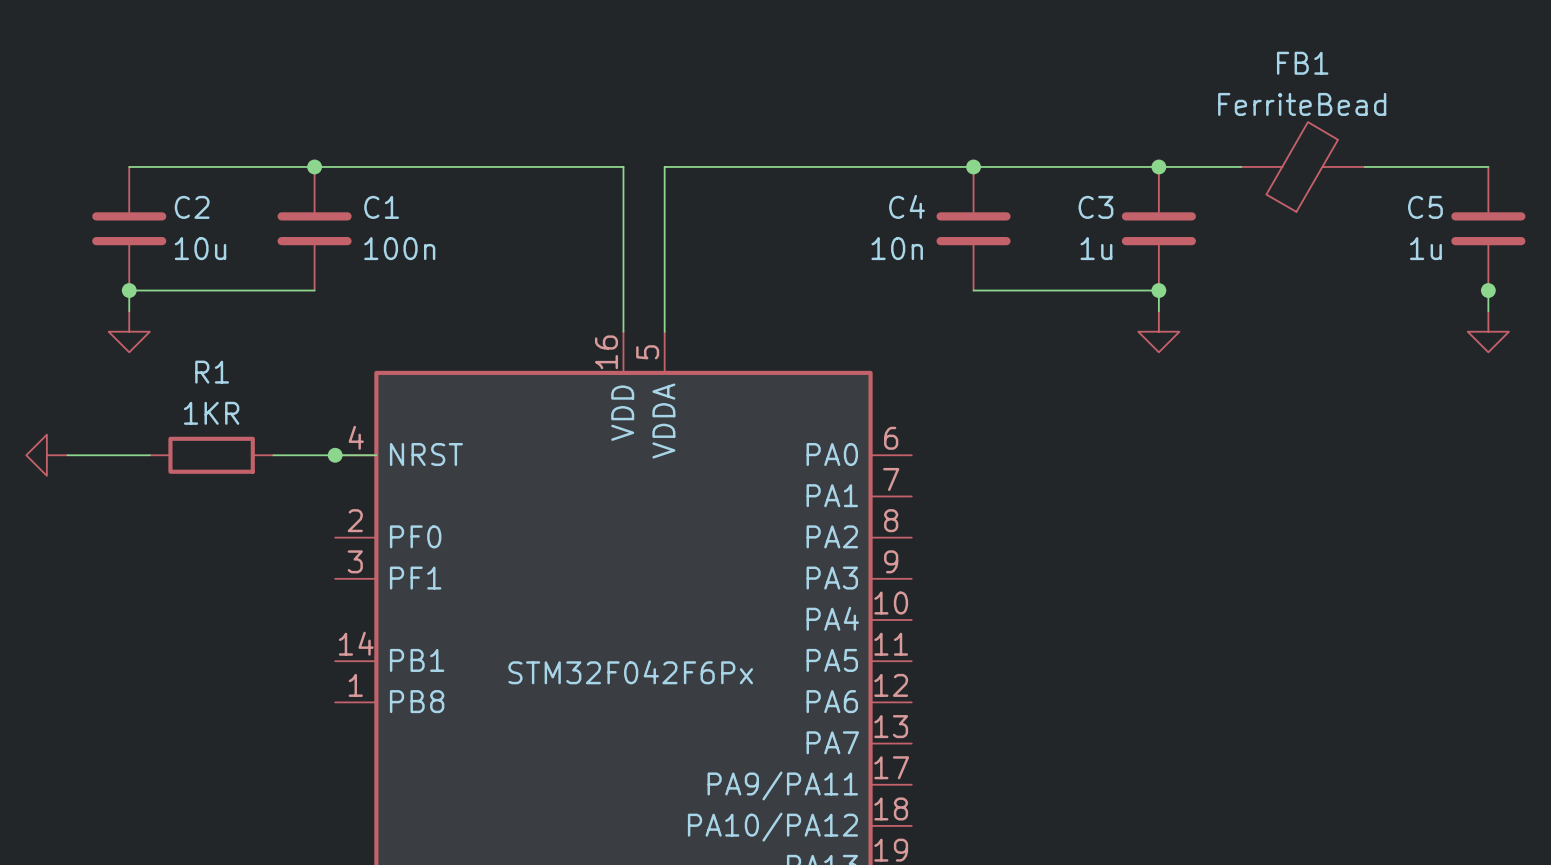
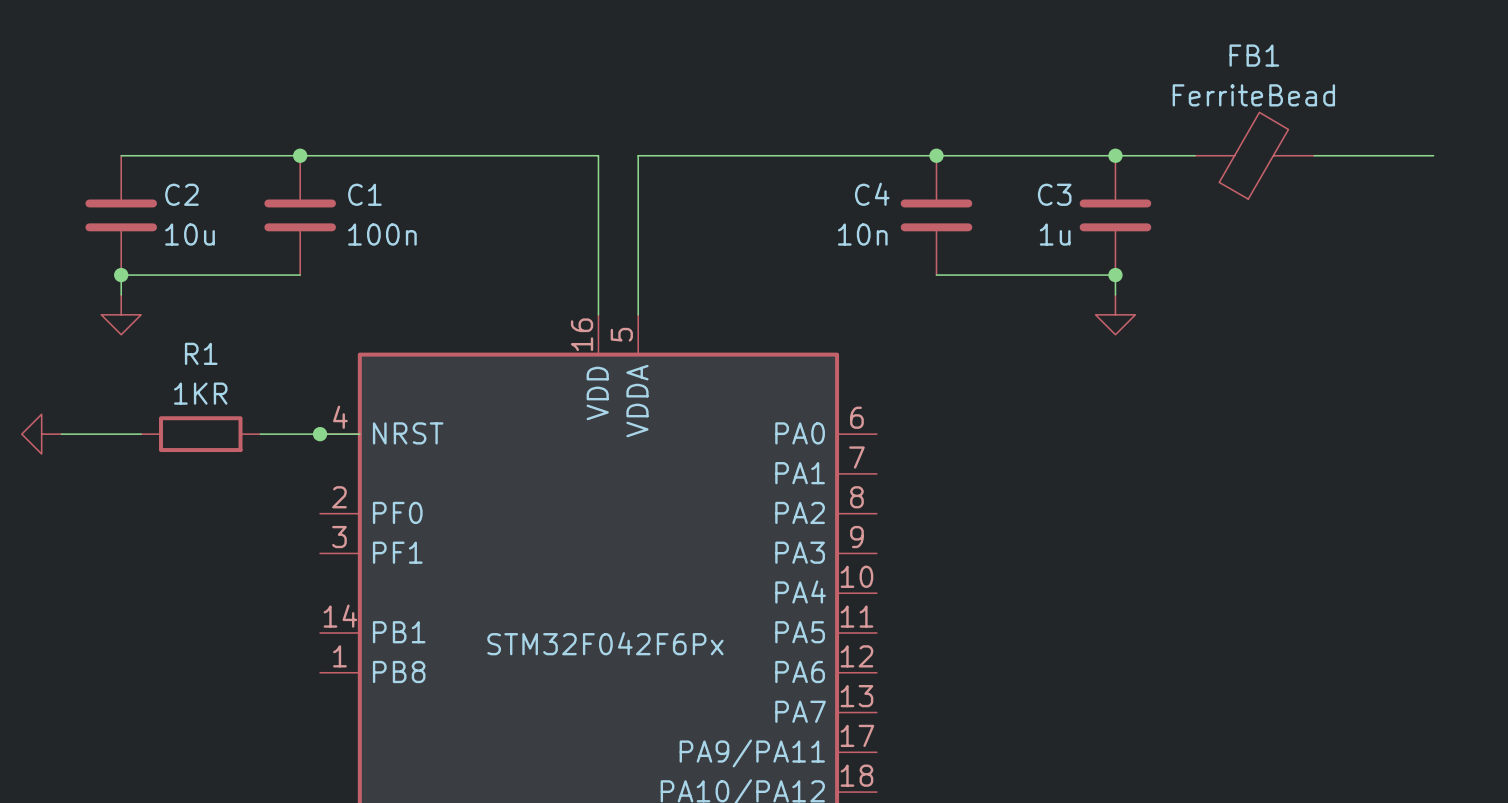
C5: 1u (1488, 228) -> none
wire: (1488, 290) (1488, 311) -> none
junction: (1488, 290) -> none
power symbol: (1488, 331) -> none

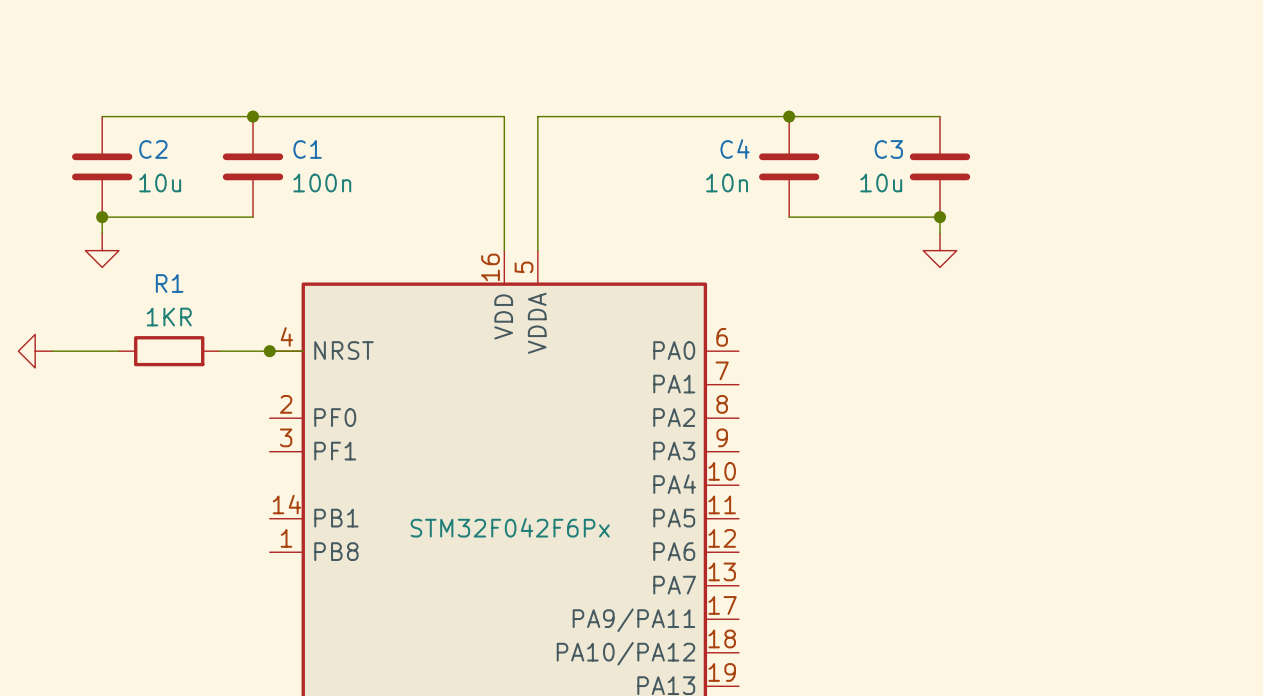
wire: (1115, 155) (1195, 155) -> none
junction: (1115, 155) -> none
FB1: FerriteBead (1254, 155) -> none
wire: (1314, 155) (1433, 155) -> none
C3 value: 1u (1055, 234) -> 10u (881, 182)

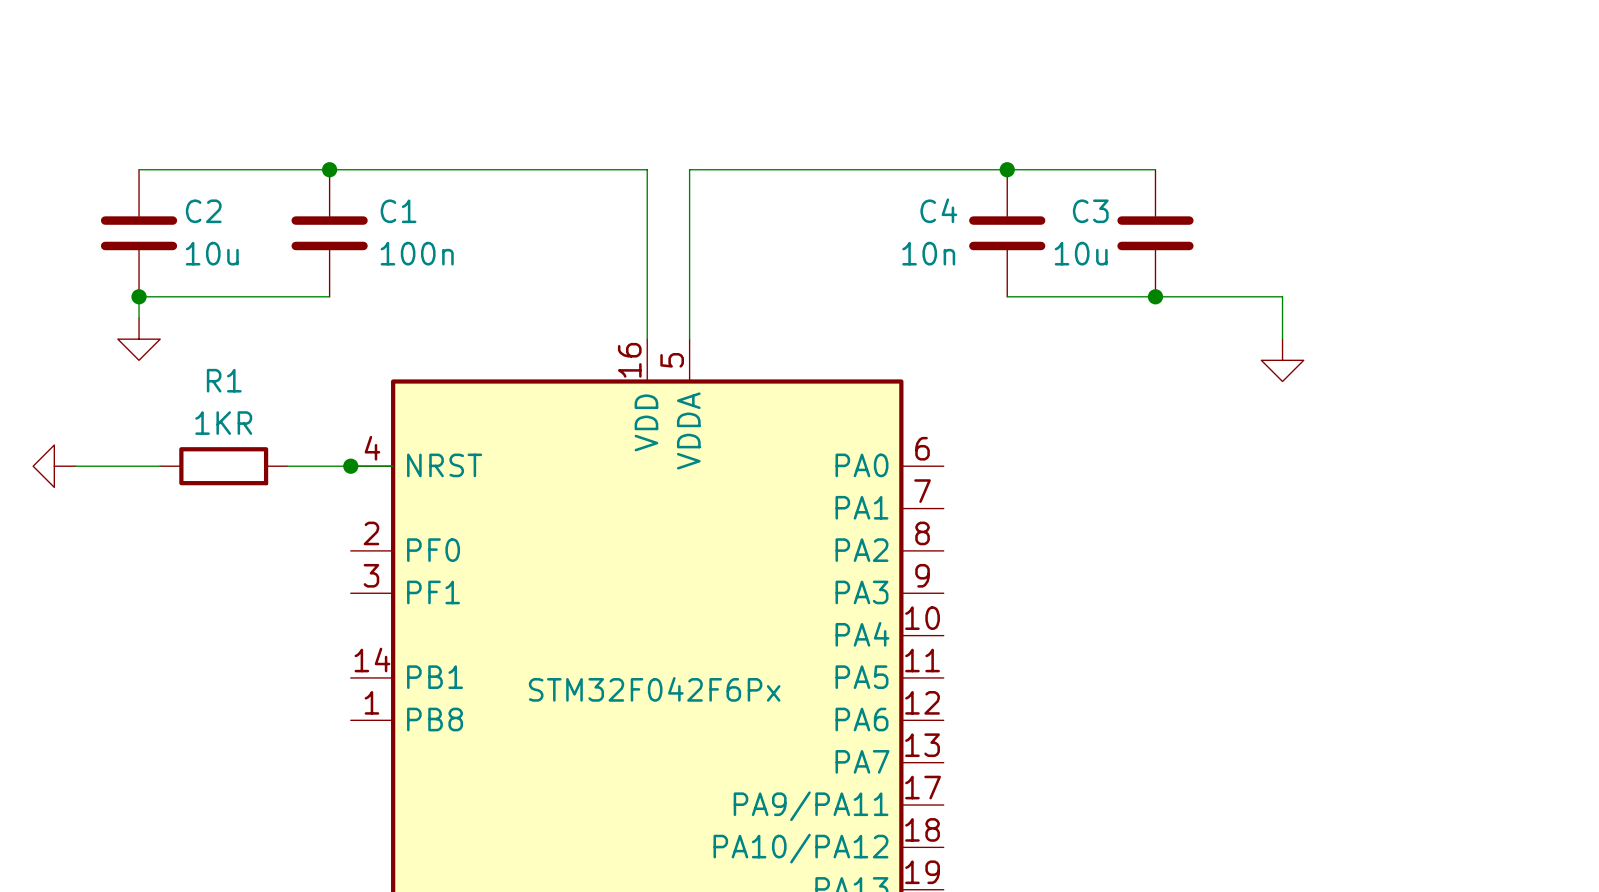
wire: (906, 116) (939, 116) -> none
C3 position: (939, 166) -> (1155, 233)
wire: (939, 217) (939, 233) -> (1197, 296) (1282, 296) (1282, 339)
junction position: (939, 217) -> (1155, 296)
power symbol position: (939, 250) -> (1282, 360)

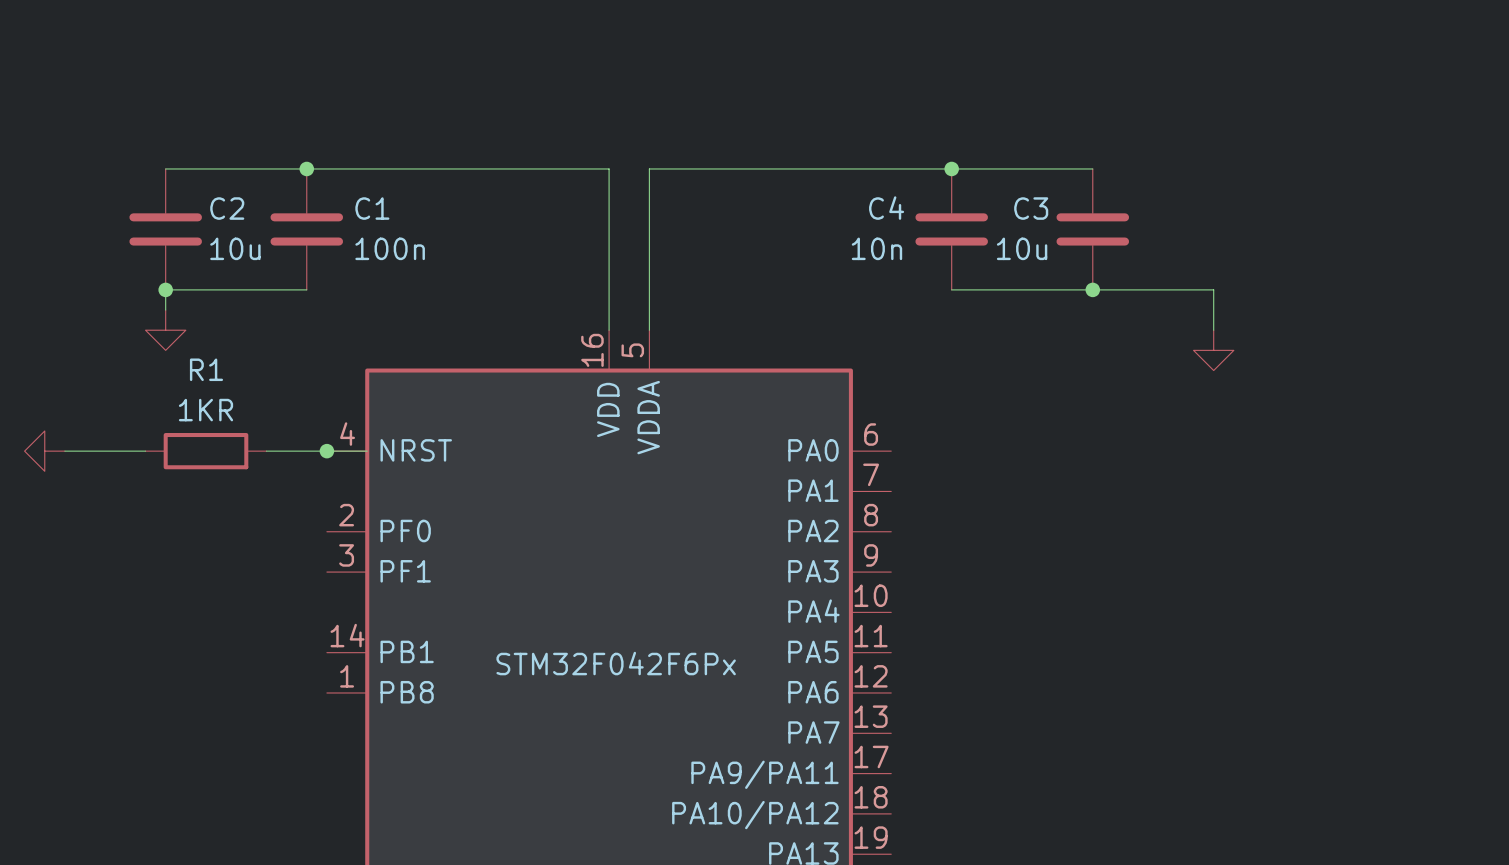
wire: (139, 169) (181, 169) -> none
C2 position: (139, 233) -> (165, 229)
junction position: (139, 296) -> (165, 289)
wire: (181, 296) (139, 296) (139, 317) -> (165, 289) (165, 310)
power symbol position: (139, 339) -> (165, 330)

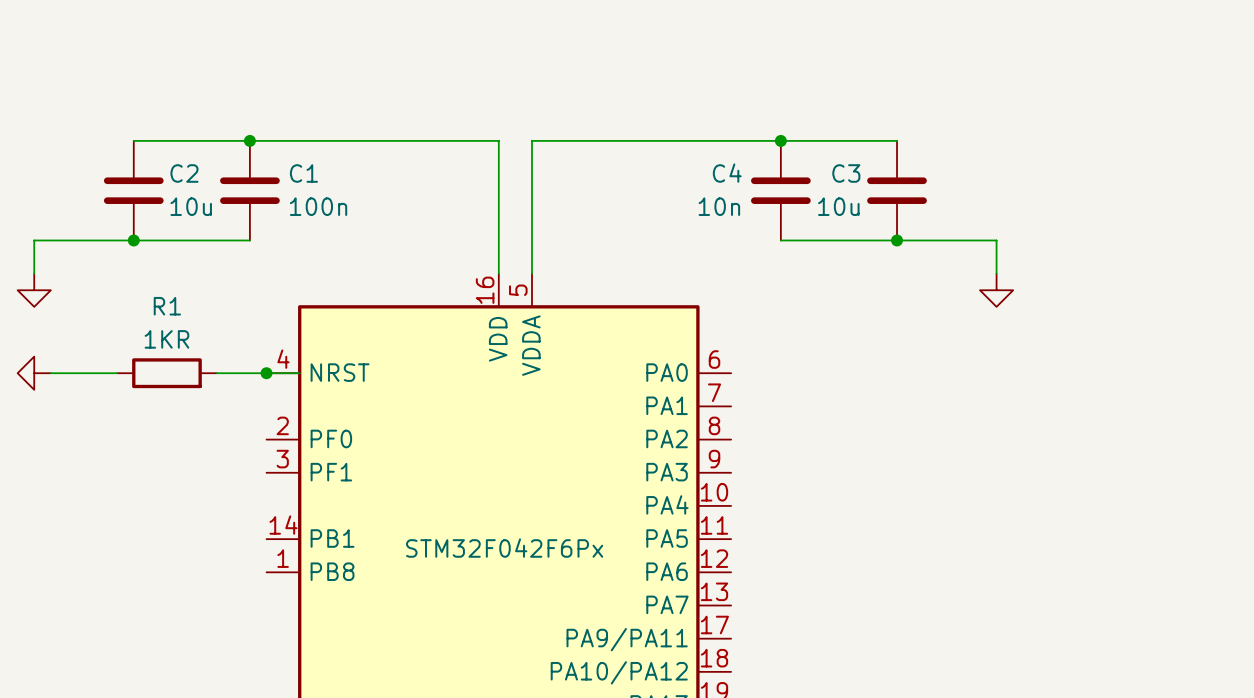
wire: (165, 289) (165, 310) -> (133, 240) (34, 240) (34, 273)
power symbol position: (165, 330) -> (34, 290)

